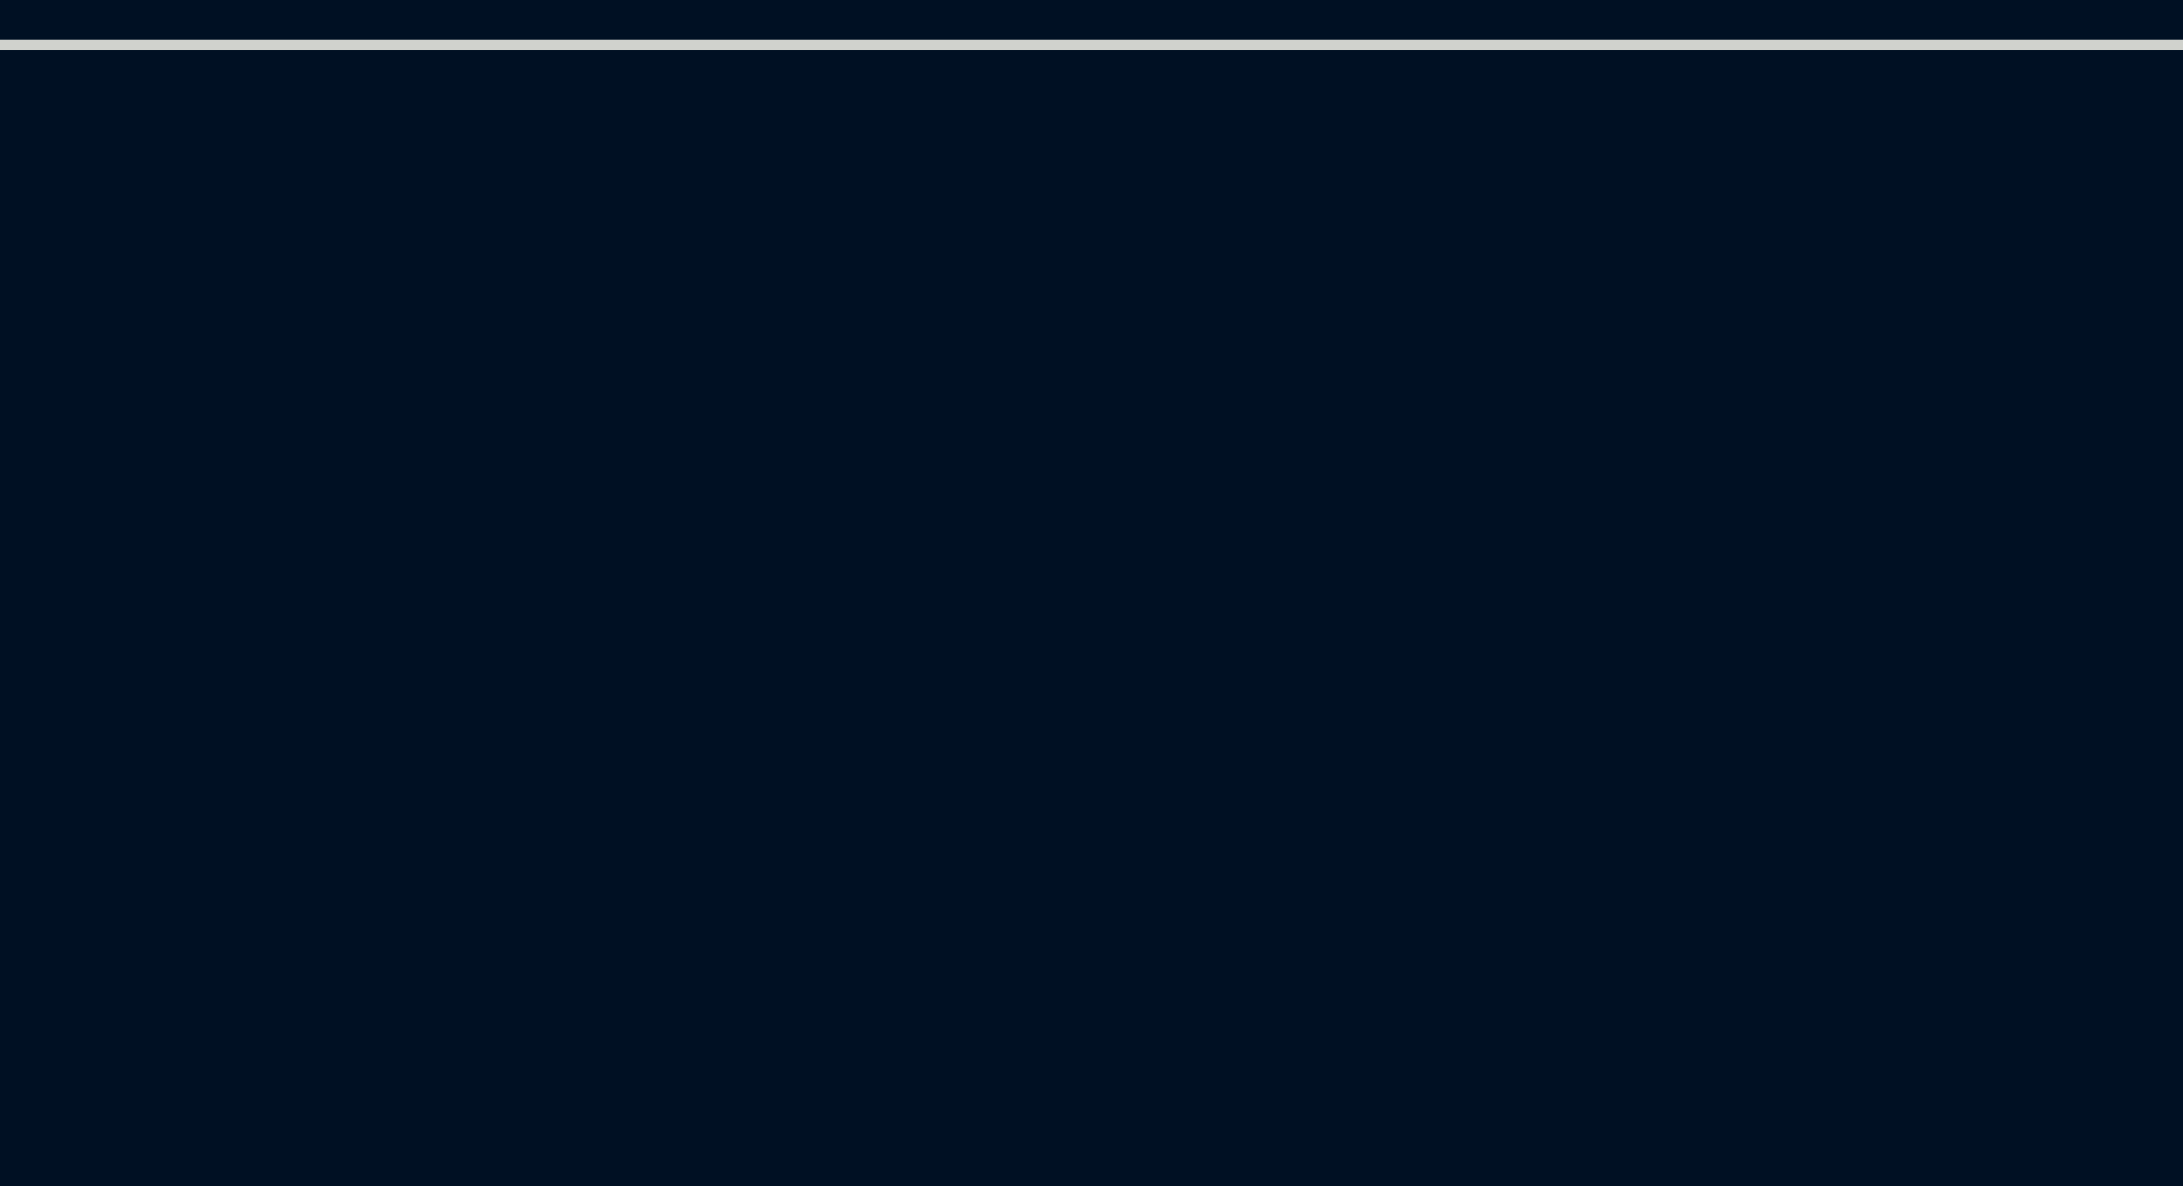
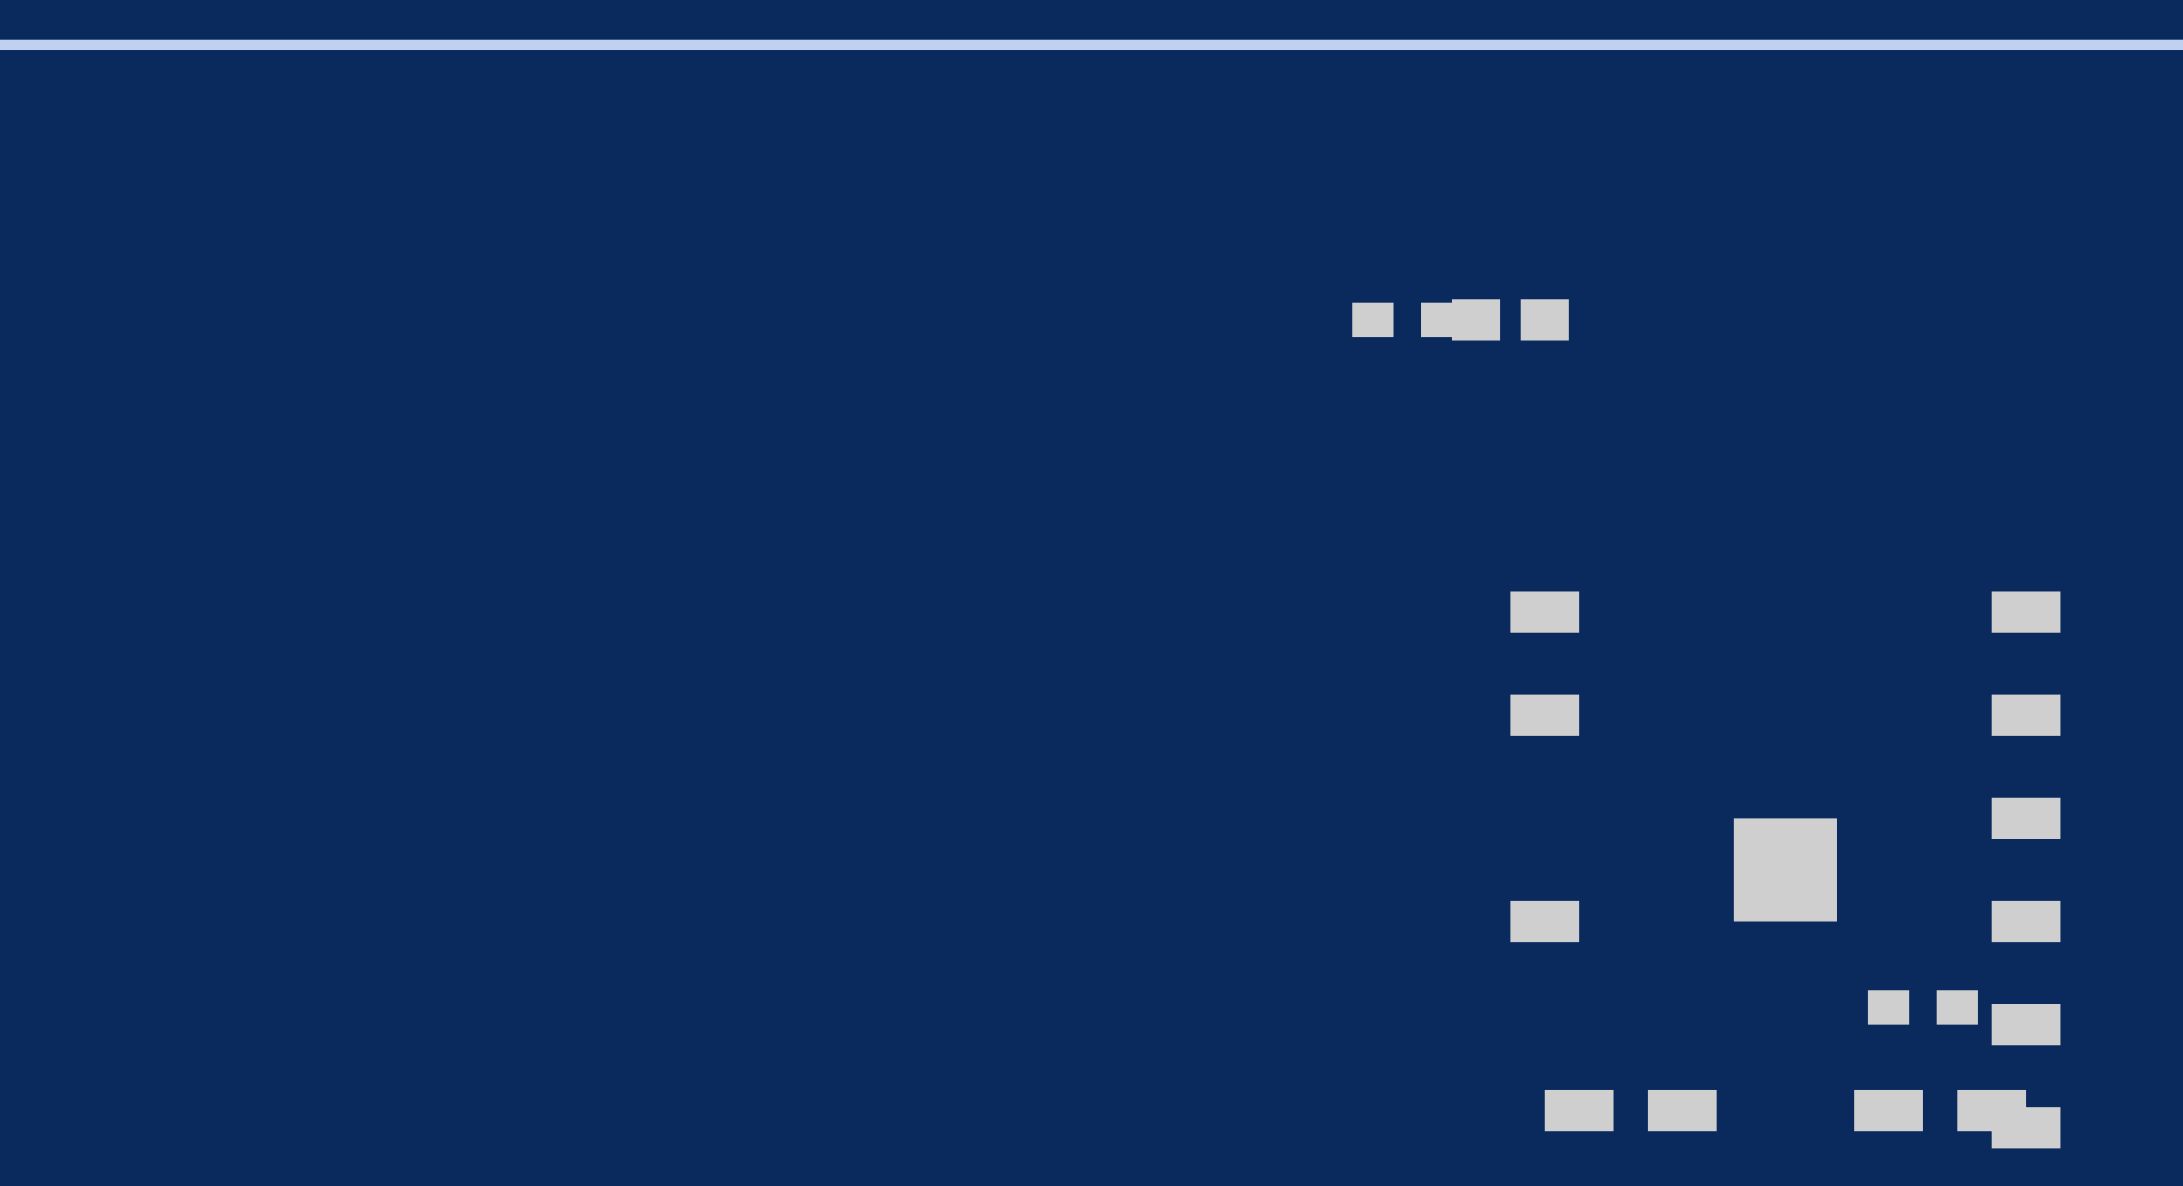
part: none -> (1407, 319)
part: none -> (1510, 319)
part: none -> (1785, 869)
part: none -> (1922, 1007)

